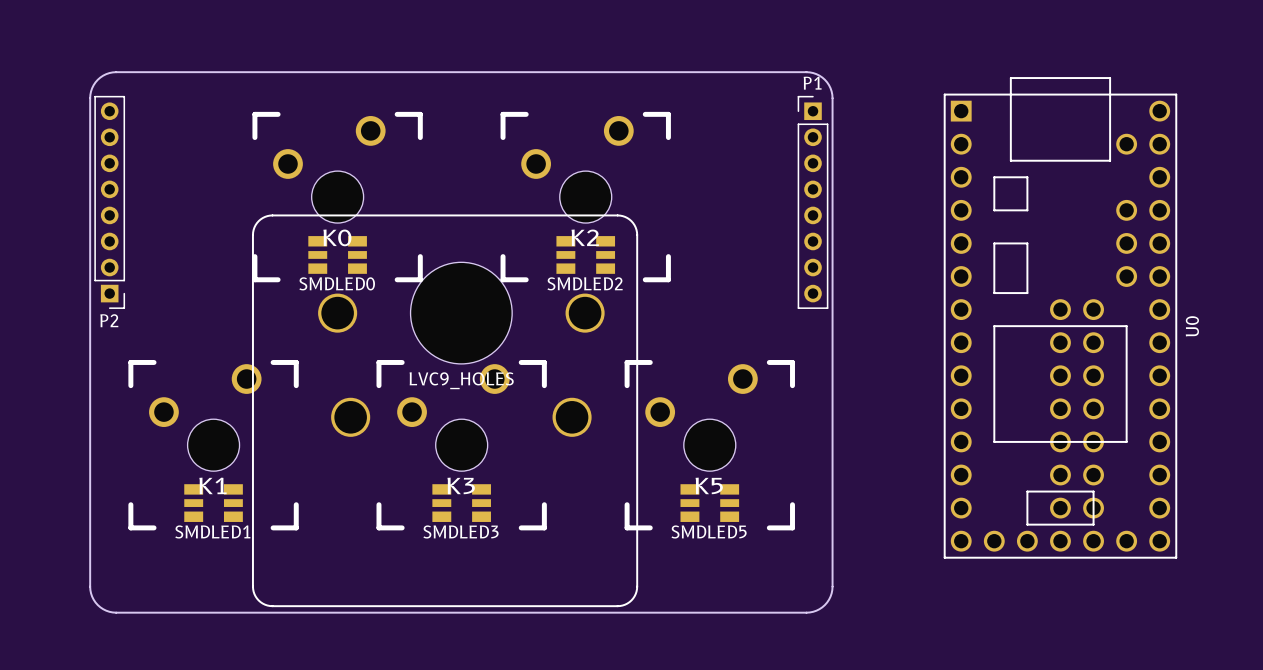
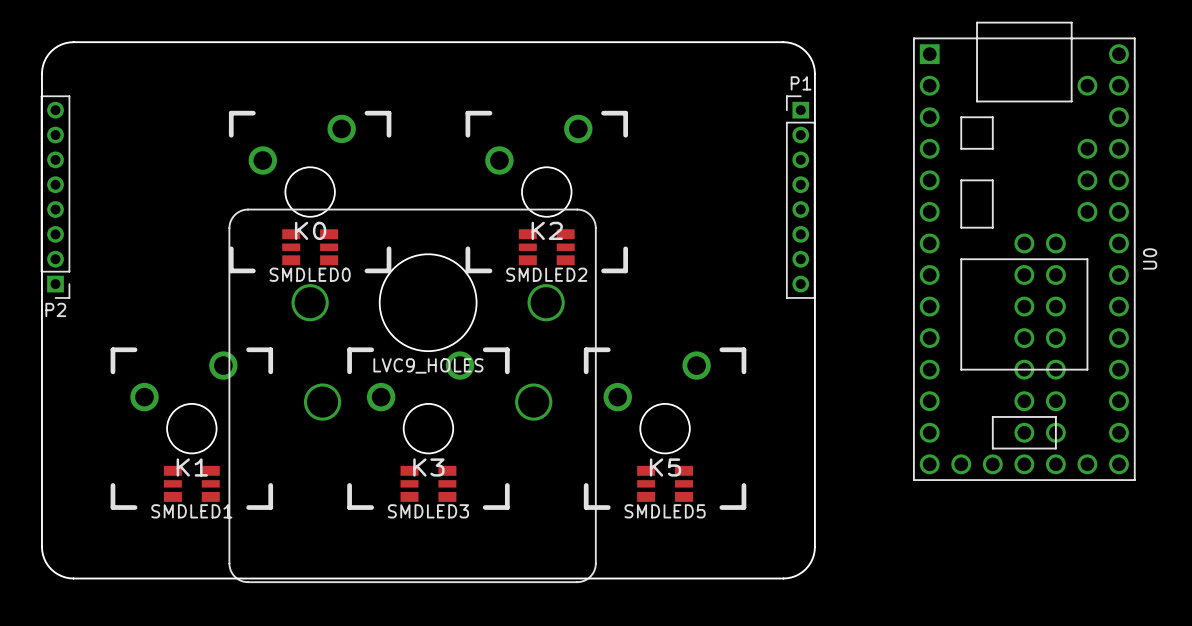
board edge: (116, 72) (806, 72) (822, 77) (830, 88) (832, 98) (832, 586) (827, 602) (819, 609) (806, 612) (116, 612) (100, 607) (92, 596) (90, 586) (90, 98) (92, 88) (97, 79) (106, 74) (116, 72) -> (73, 42) (61, 44) (51, 51) (44, 61) (41, 73) (41, 546) (46, 562) (54, 571) (61, 576) (73, 578) (783, 578) (795, 576) (808, 566) (813, 555) (814, 546) (814, 73) (810, 57) (802, 48) (791, 43) (783, 42) (73, 42)
P2 position: (109, 202) -> (55, 197)
P1 position: (813, 202) -> (800, 197)
U0 position: (1060, 317) -> (1024, 251)

